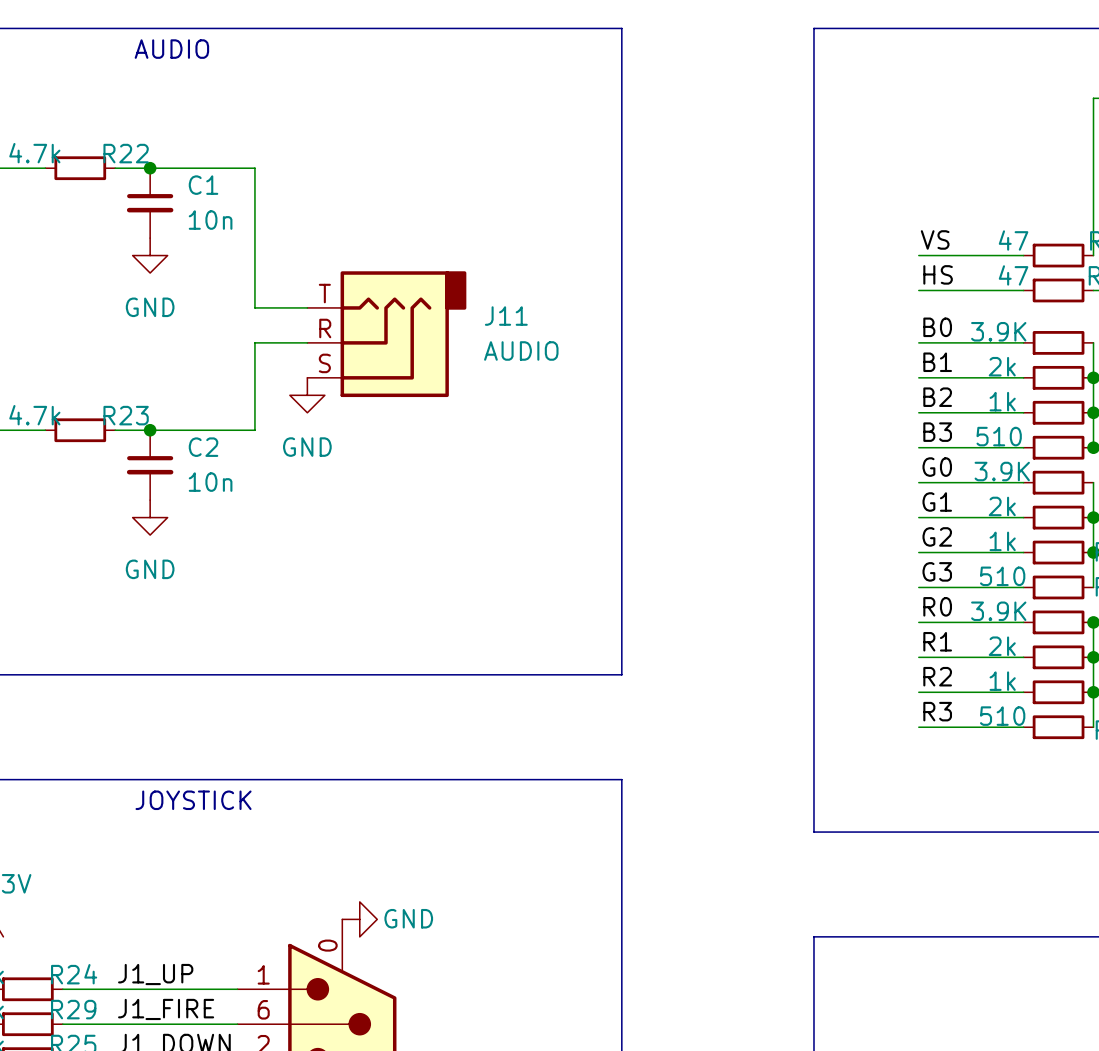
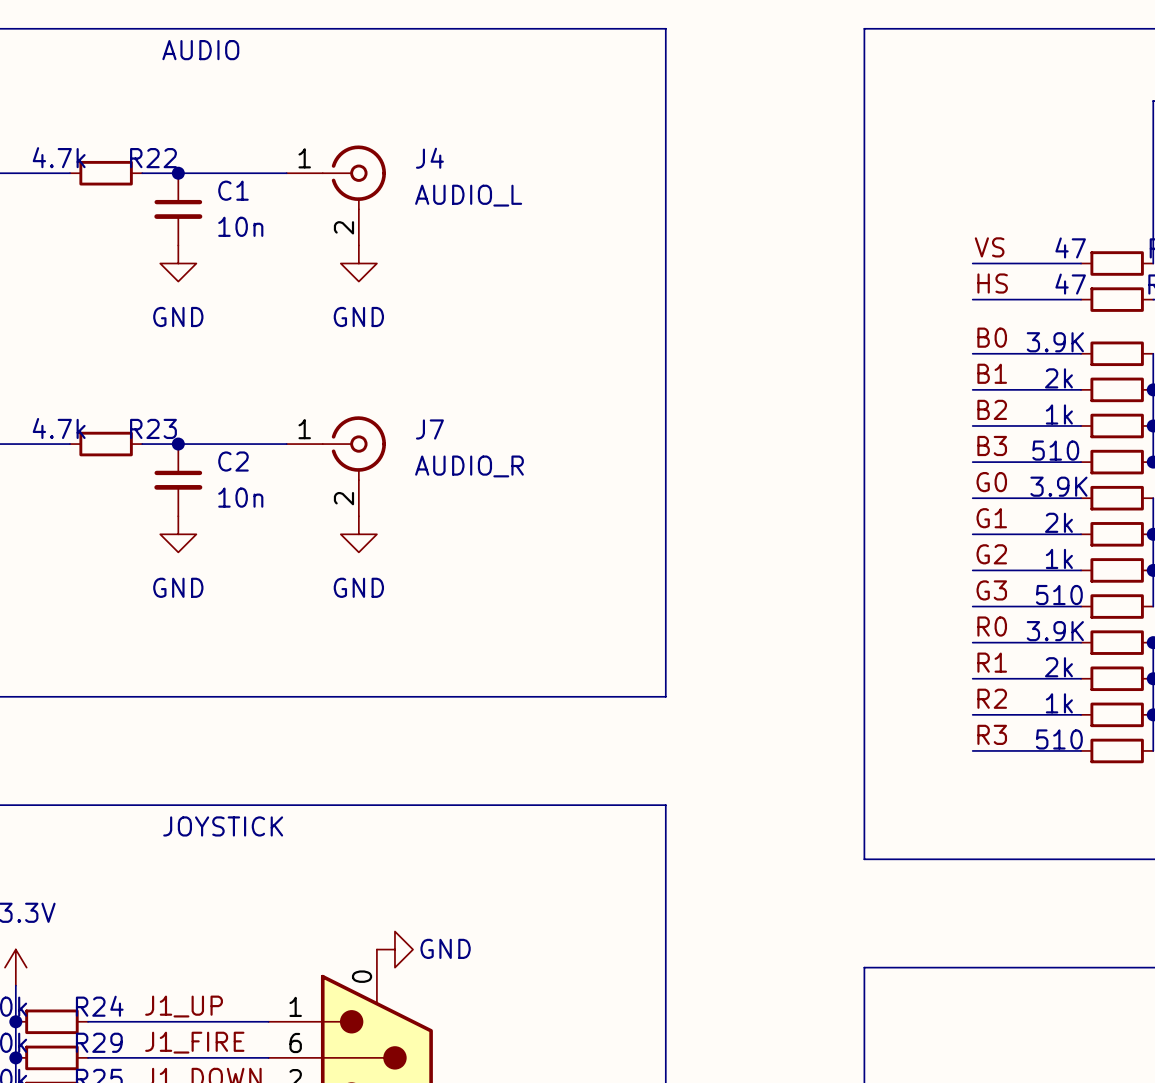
wire: (254, 168) (254, 307) (307, 307) -> none
J4: none -> AUDIO_L (336, 195)
power symbol: none -> GND (358, 263)
J11: AUDIO (386, 334) -> none
wire: (307, 342) (254, 342) (254, 430) -> none
power symbol: GND (307, 395) -> none
J7: none -> AUDIO_R (336, 466)
power symbol: none -> GND (358, 534)

